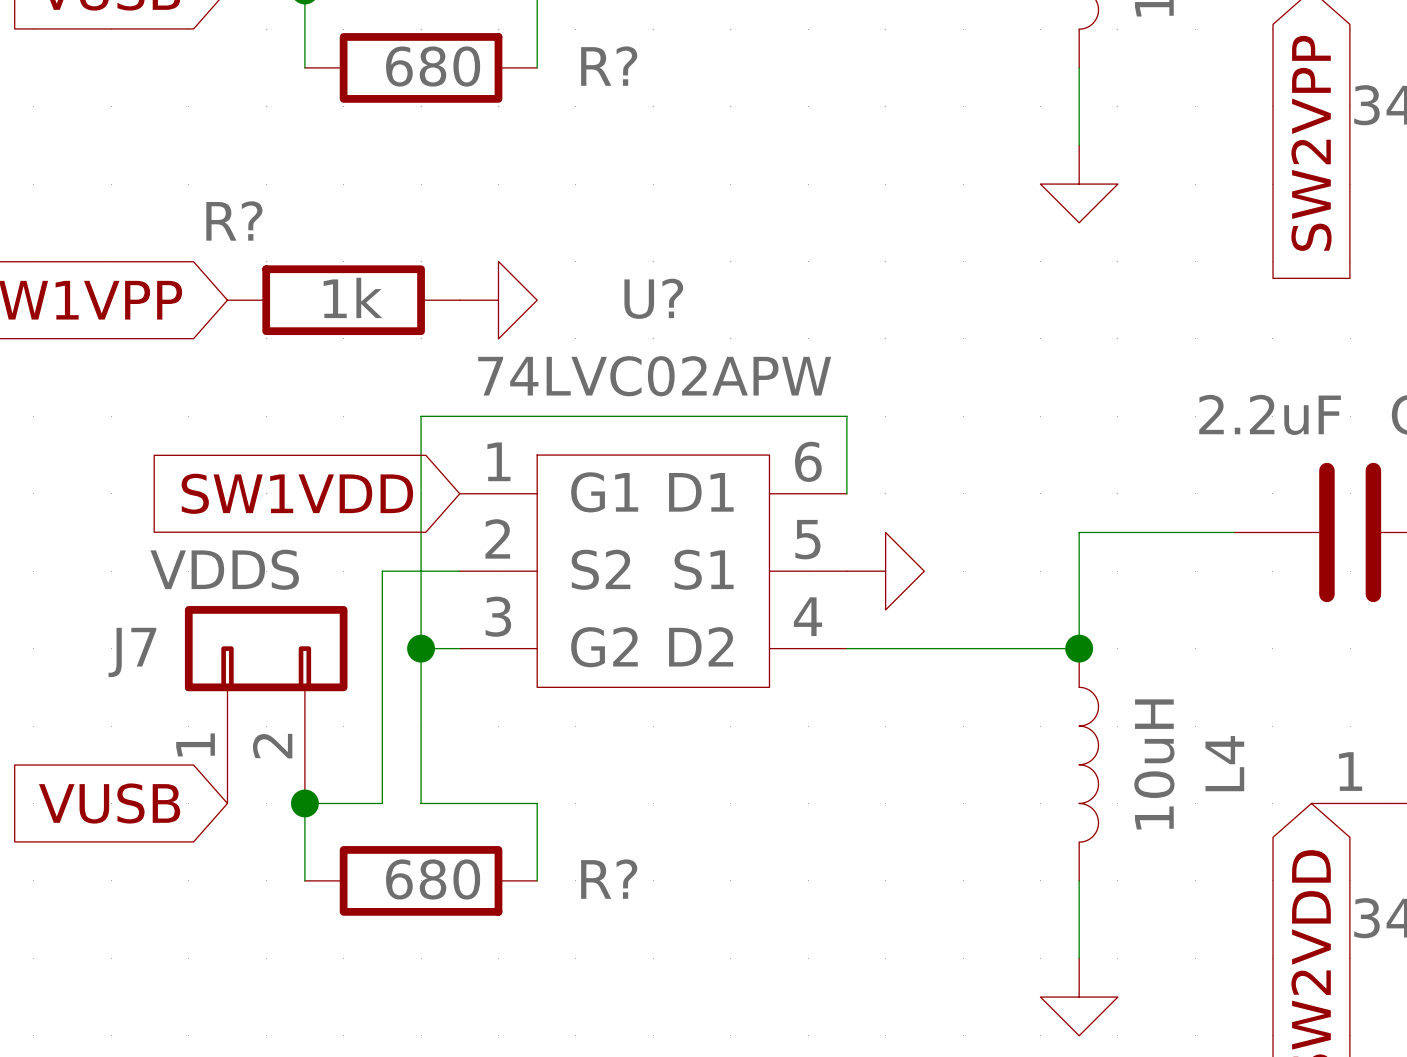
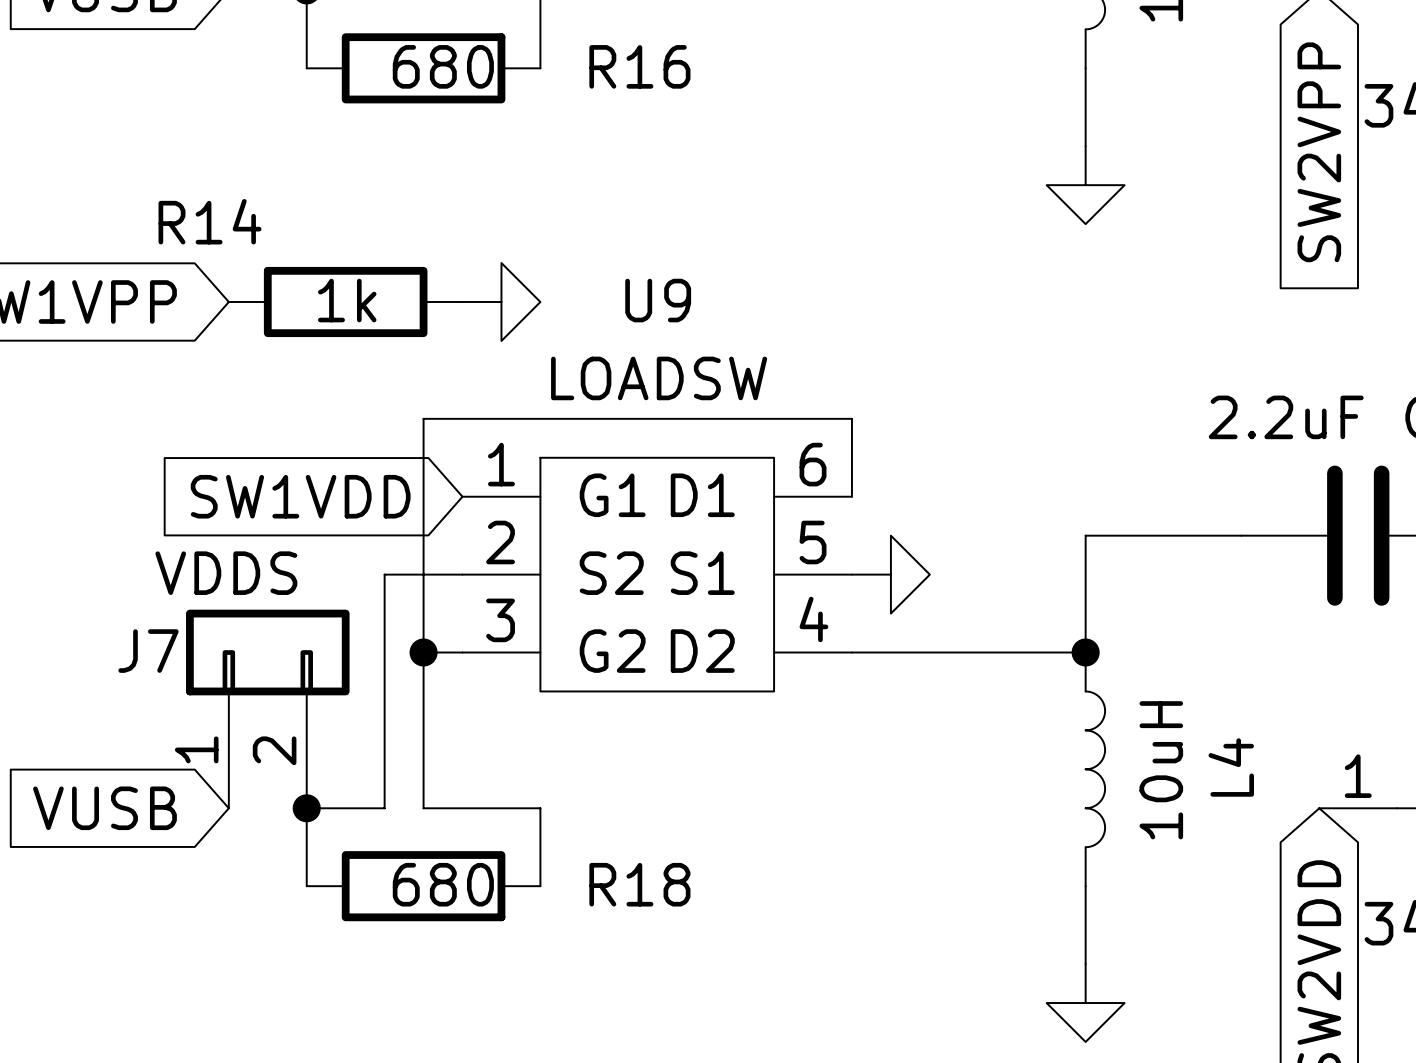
R? name: R? (609, 66) -> R16 (639, 66)
R? name: R? (234, 220) -> R14 (210, 221)
U? name: U? (653, 298) -> U9 (658, 300)
U? value: 74LVC02APW (654, 376) -> LOADSW (659, 378)
R? name: R? (609, 879) -> R18 (639, 884)

